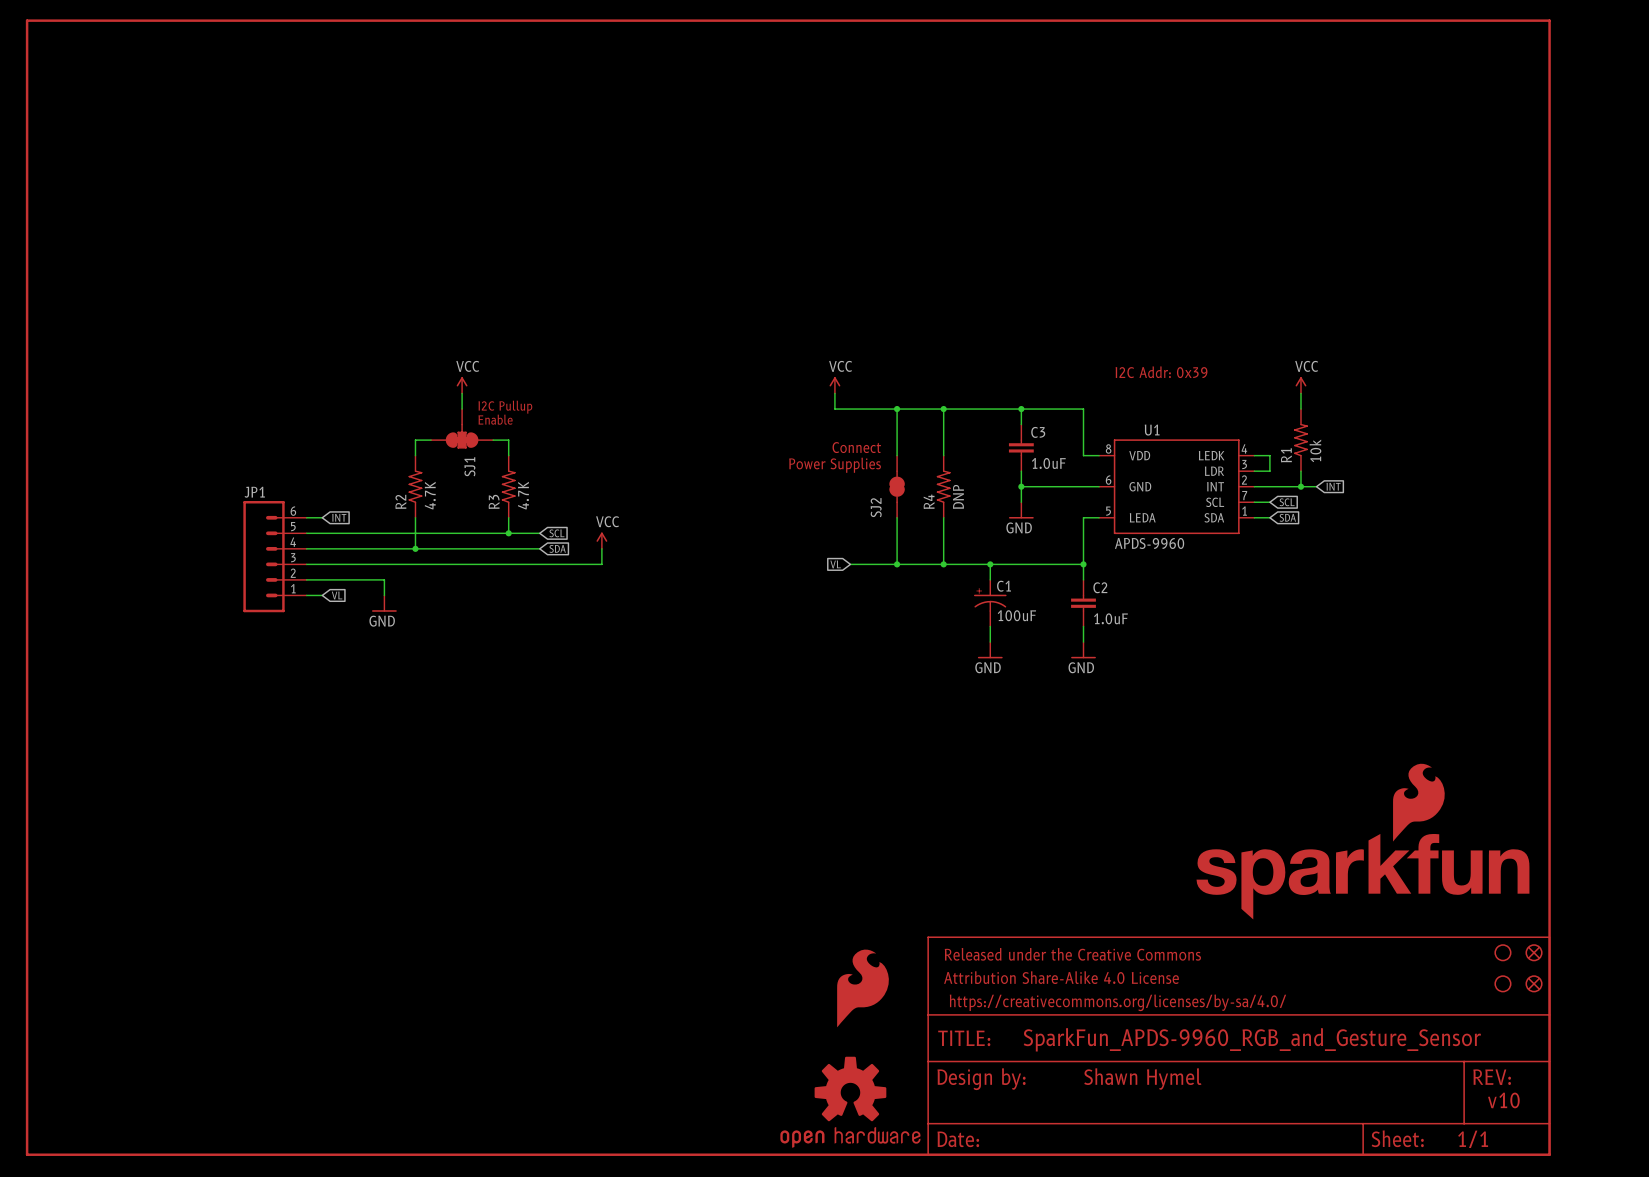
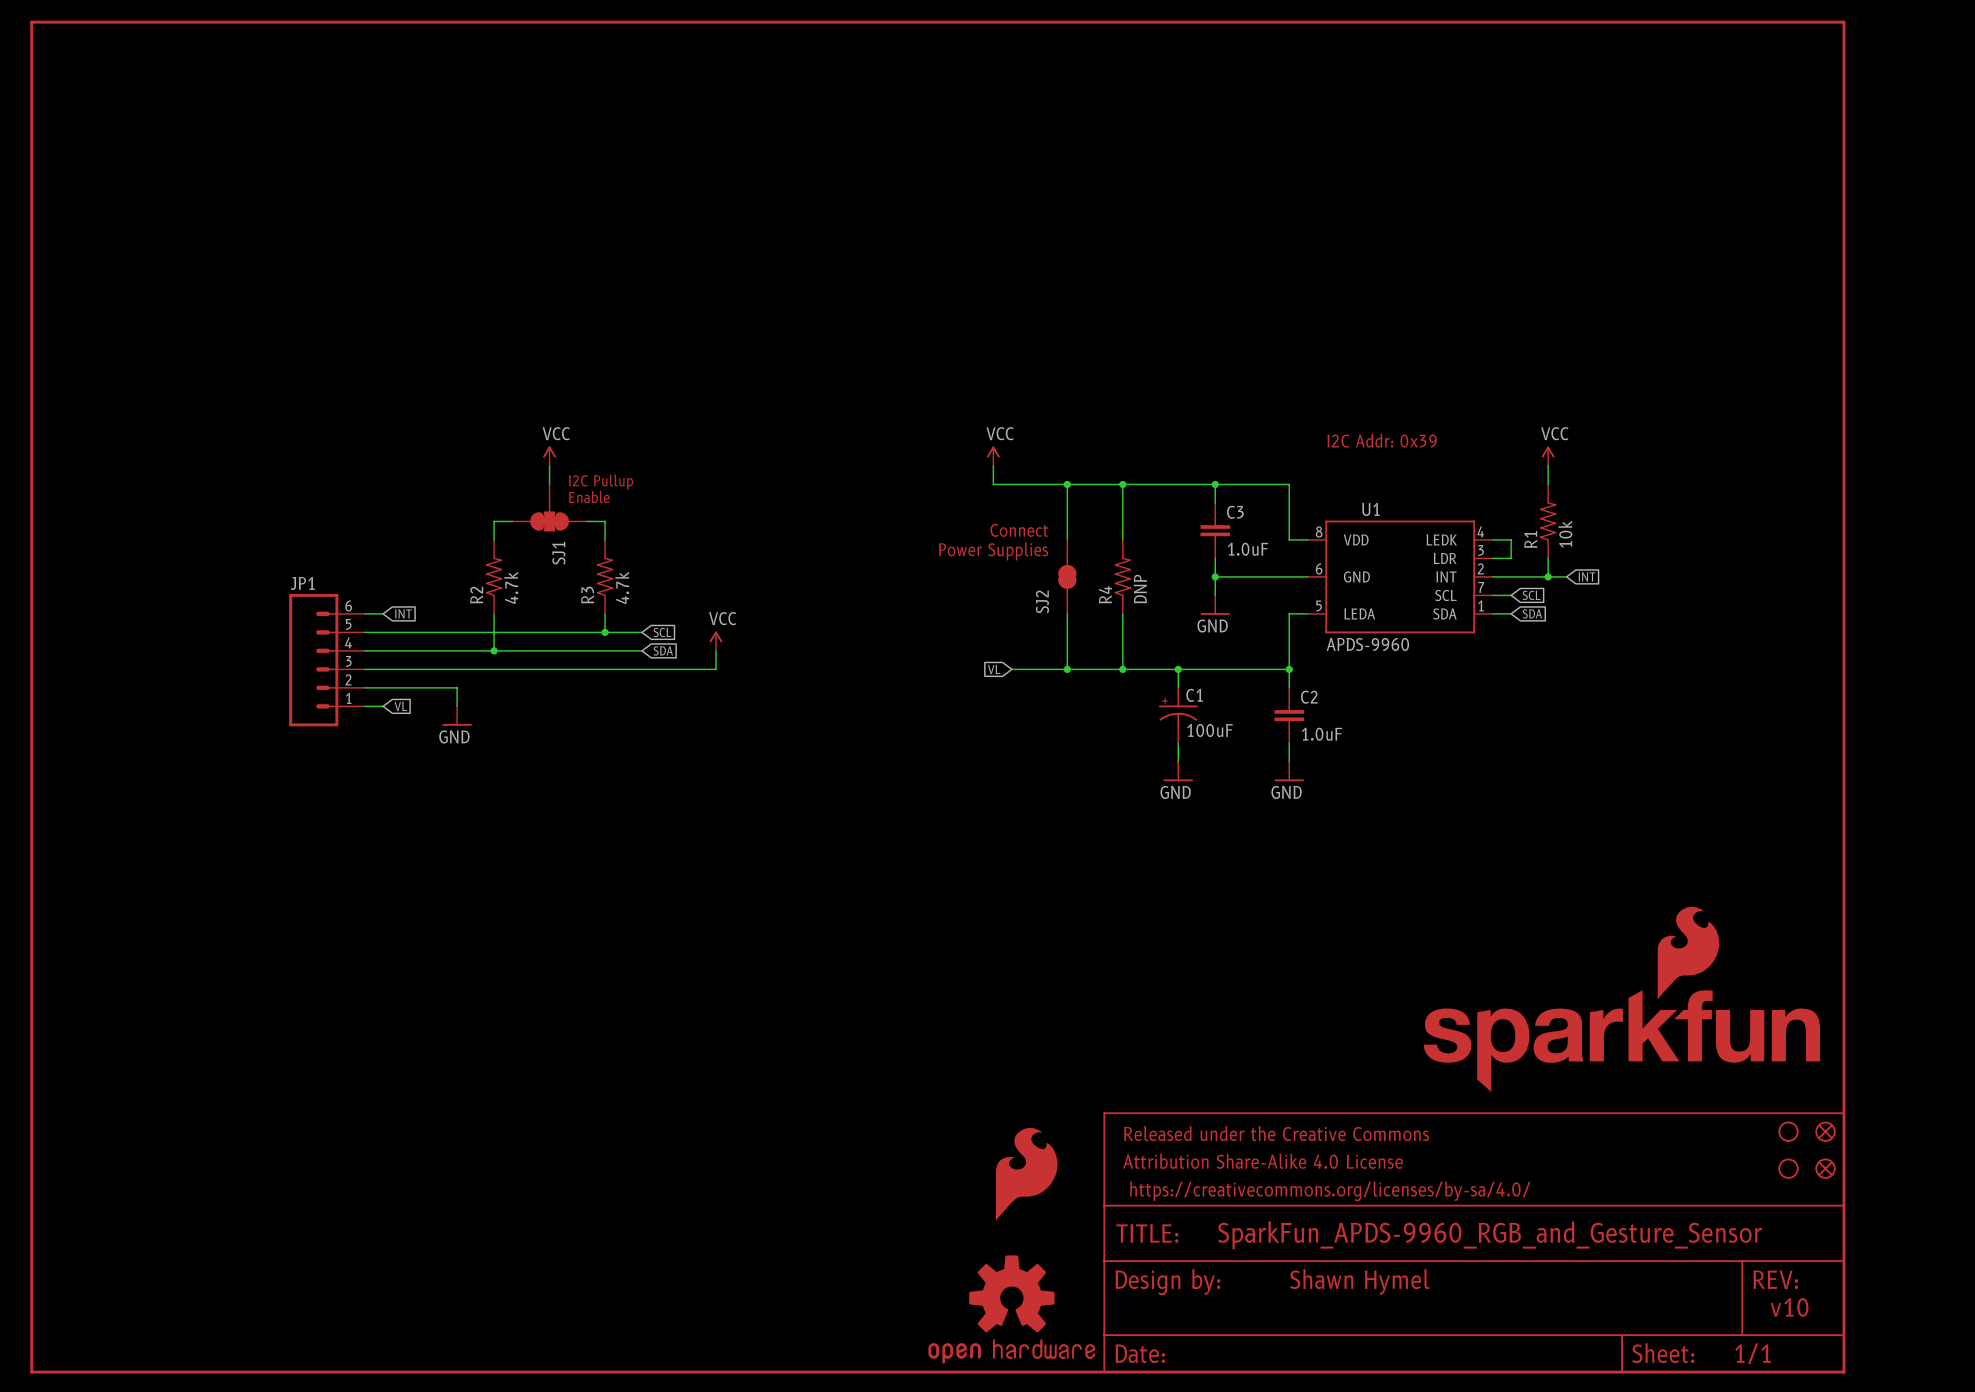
R2 value: 4.7K (430, 495) -> 4.7k (511, 587)
R3 value: 4.7K (523, 495) -> 4.7k (622, 587)

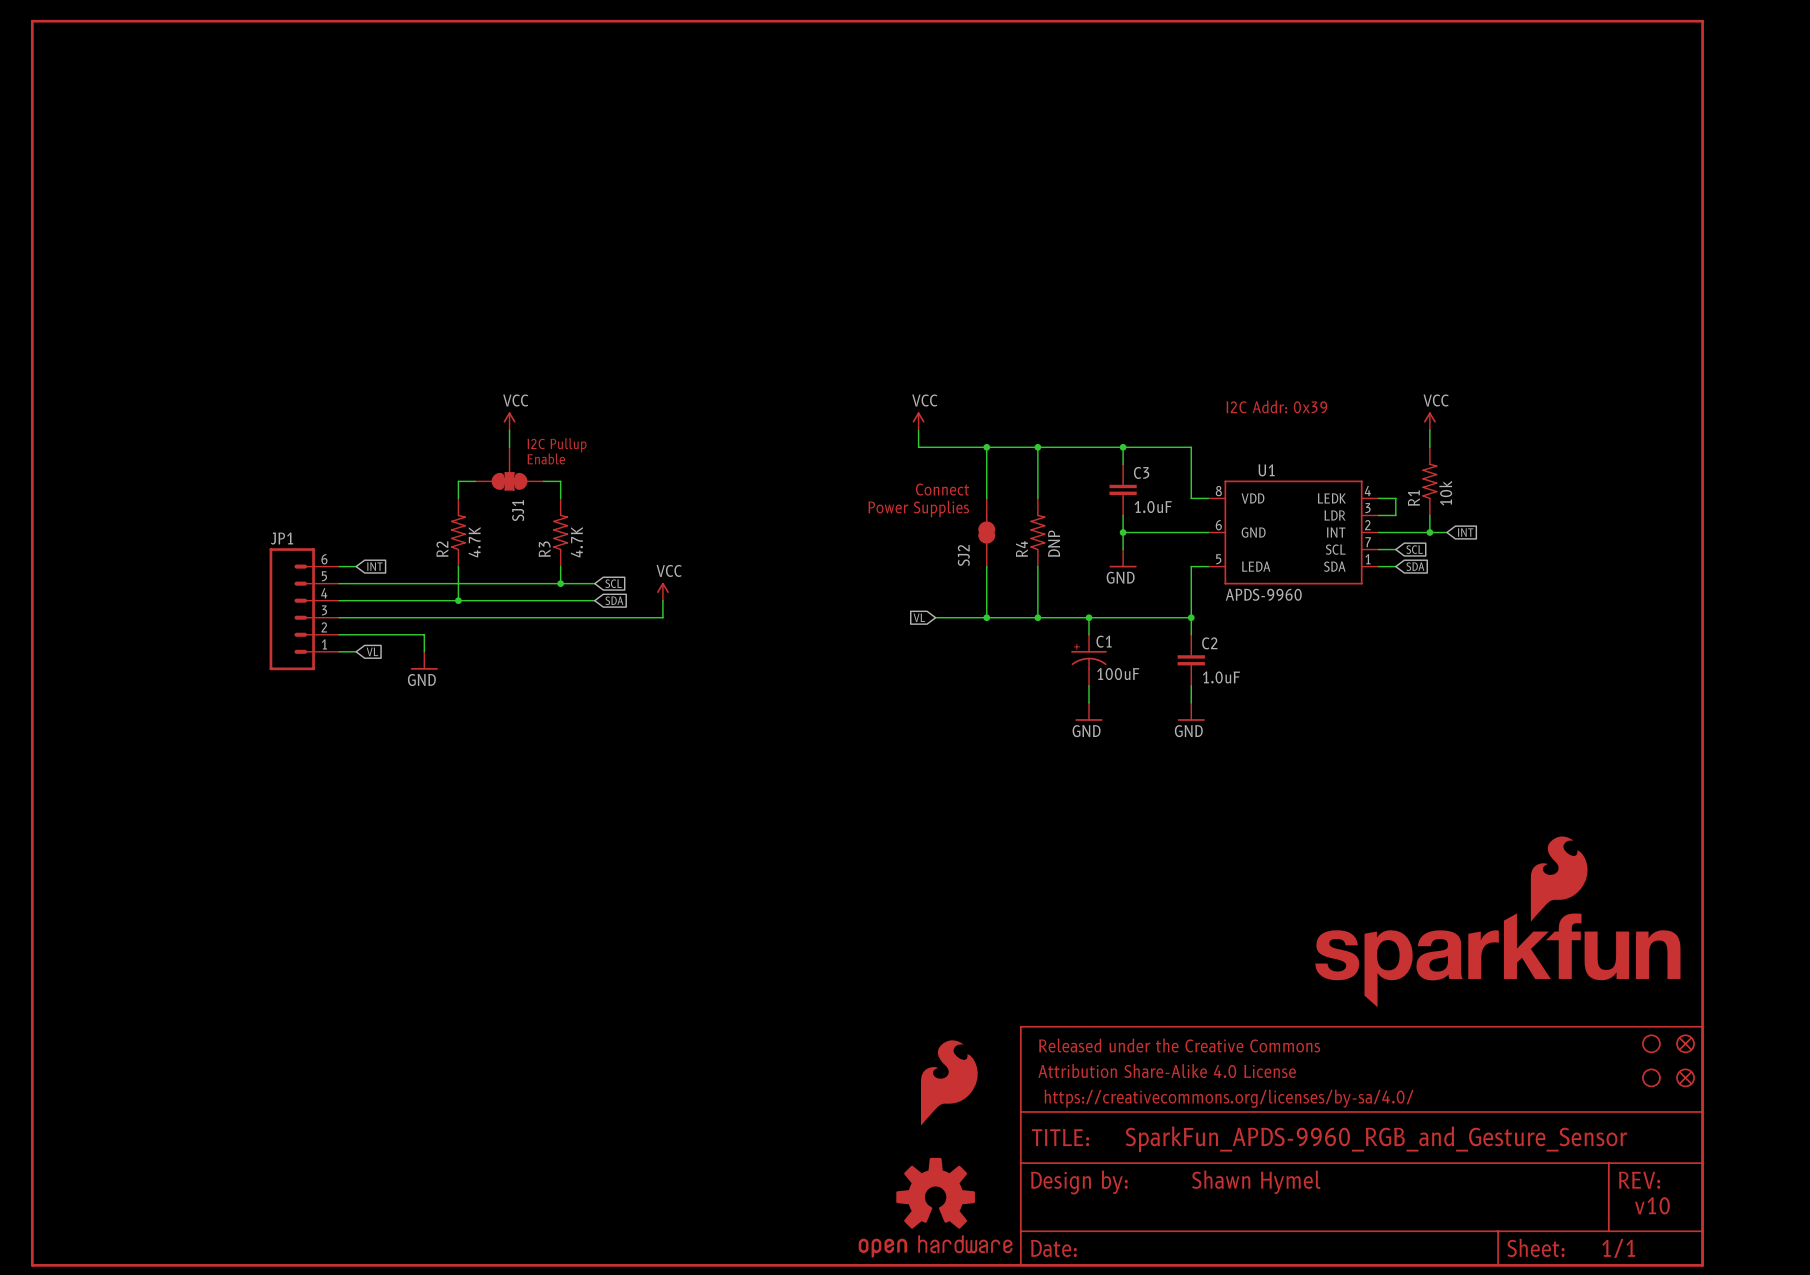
R2 value: 4.7k (511, 587) -> 4.7K (474, 542)
R3 value: 4.7k (622, 587) -> 4.7K (576, 542)

